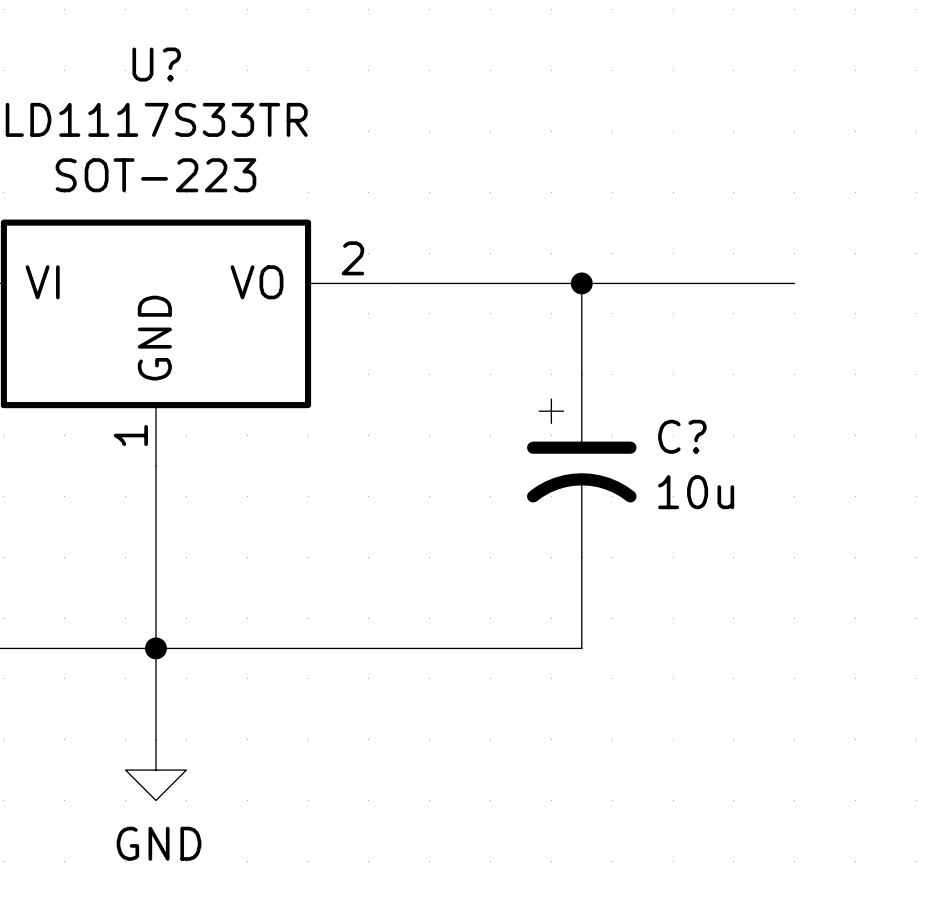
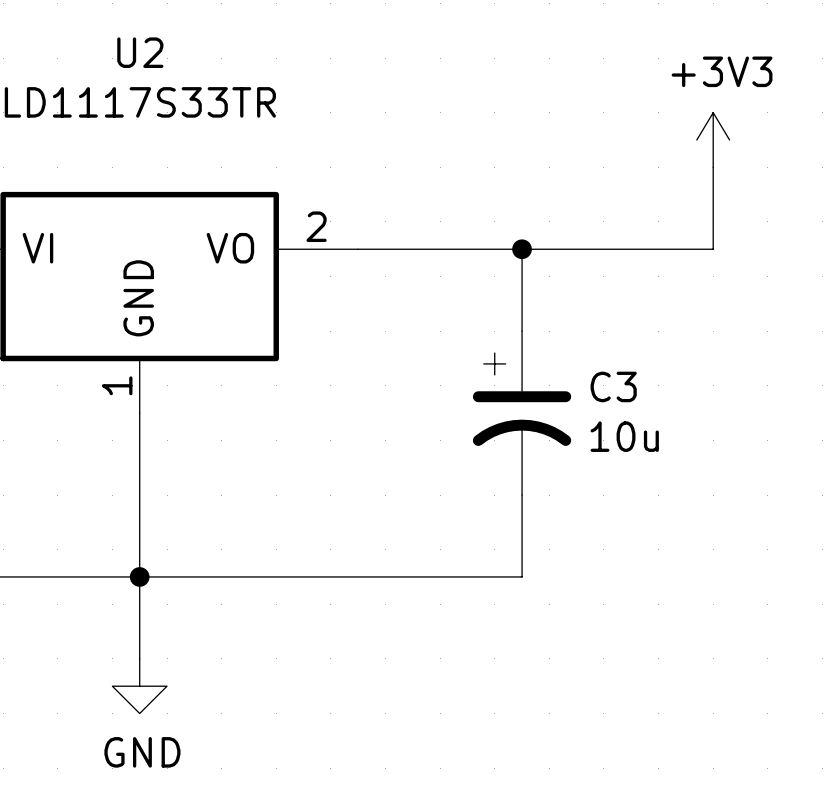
U? name: U? (156, 64) -> U2 (140, 52)
power symbol: none -> +3V3 (713, 140)
U? text: SOT-223 (155, 175) -> none
wire: none -> (713, 167) (713, 249)
C? name: C? (682, 436) -> C3 (613, 386)

